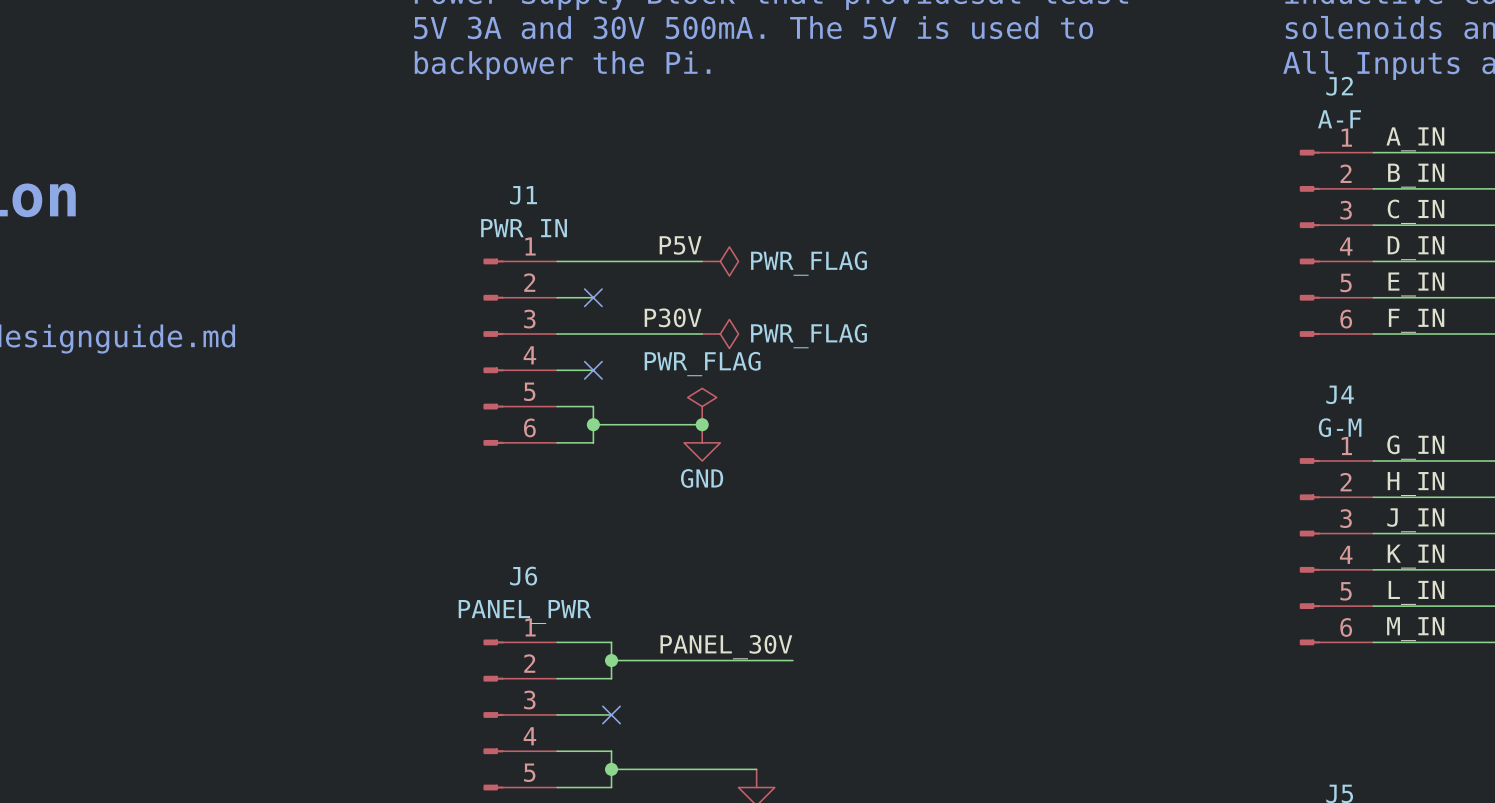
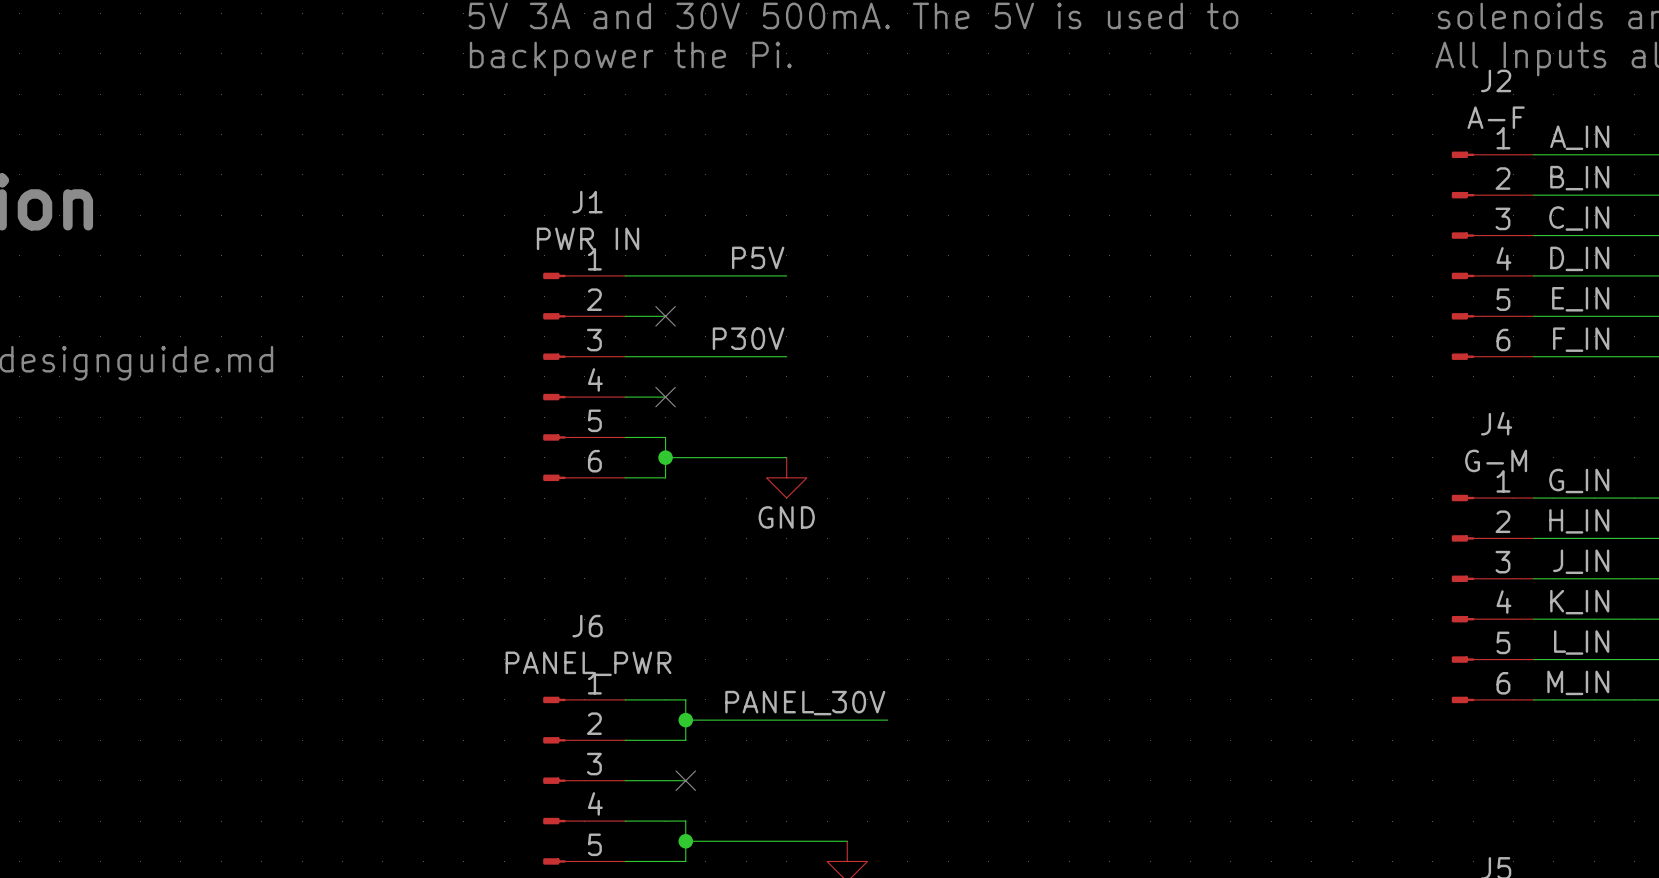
power symbol: PWR_FLAG (720, 261) -> none
power symbol: PWR_FLAG (720, 334) -> none
power symbol: PWR_FLAG (702, 406) -> none
junction: (702, 424) -> none

